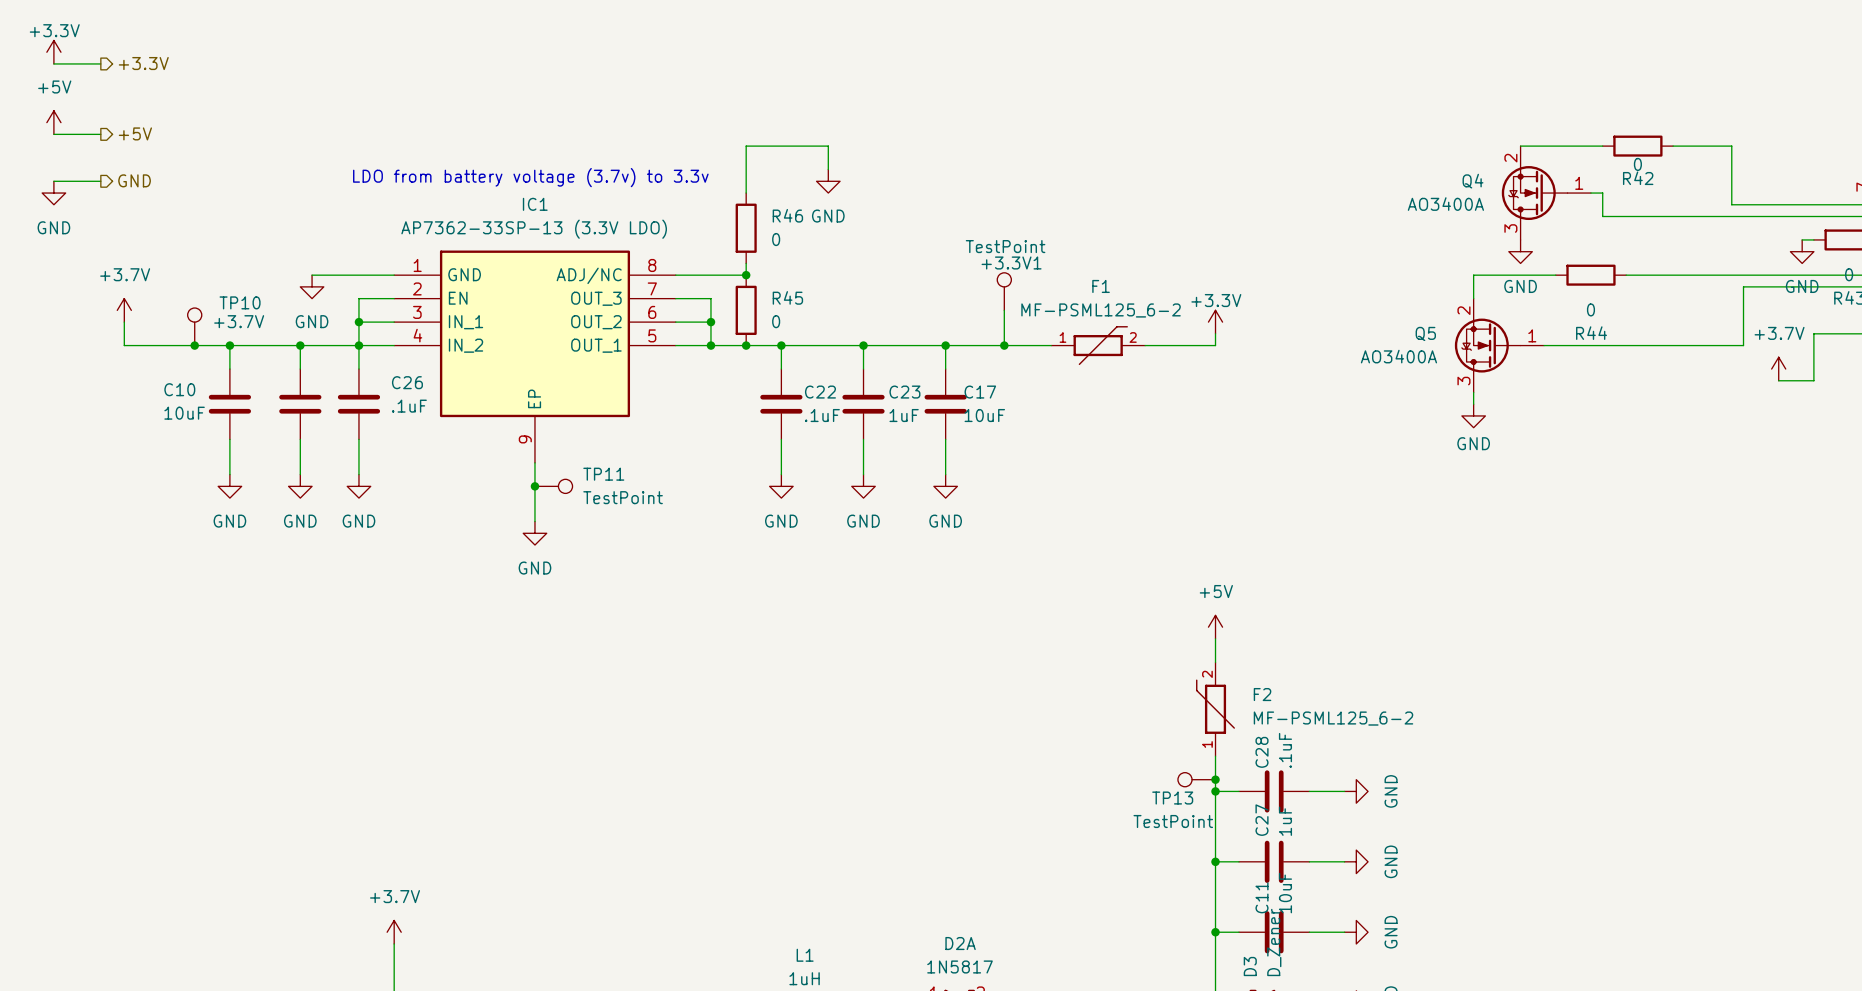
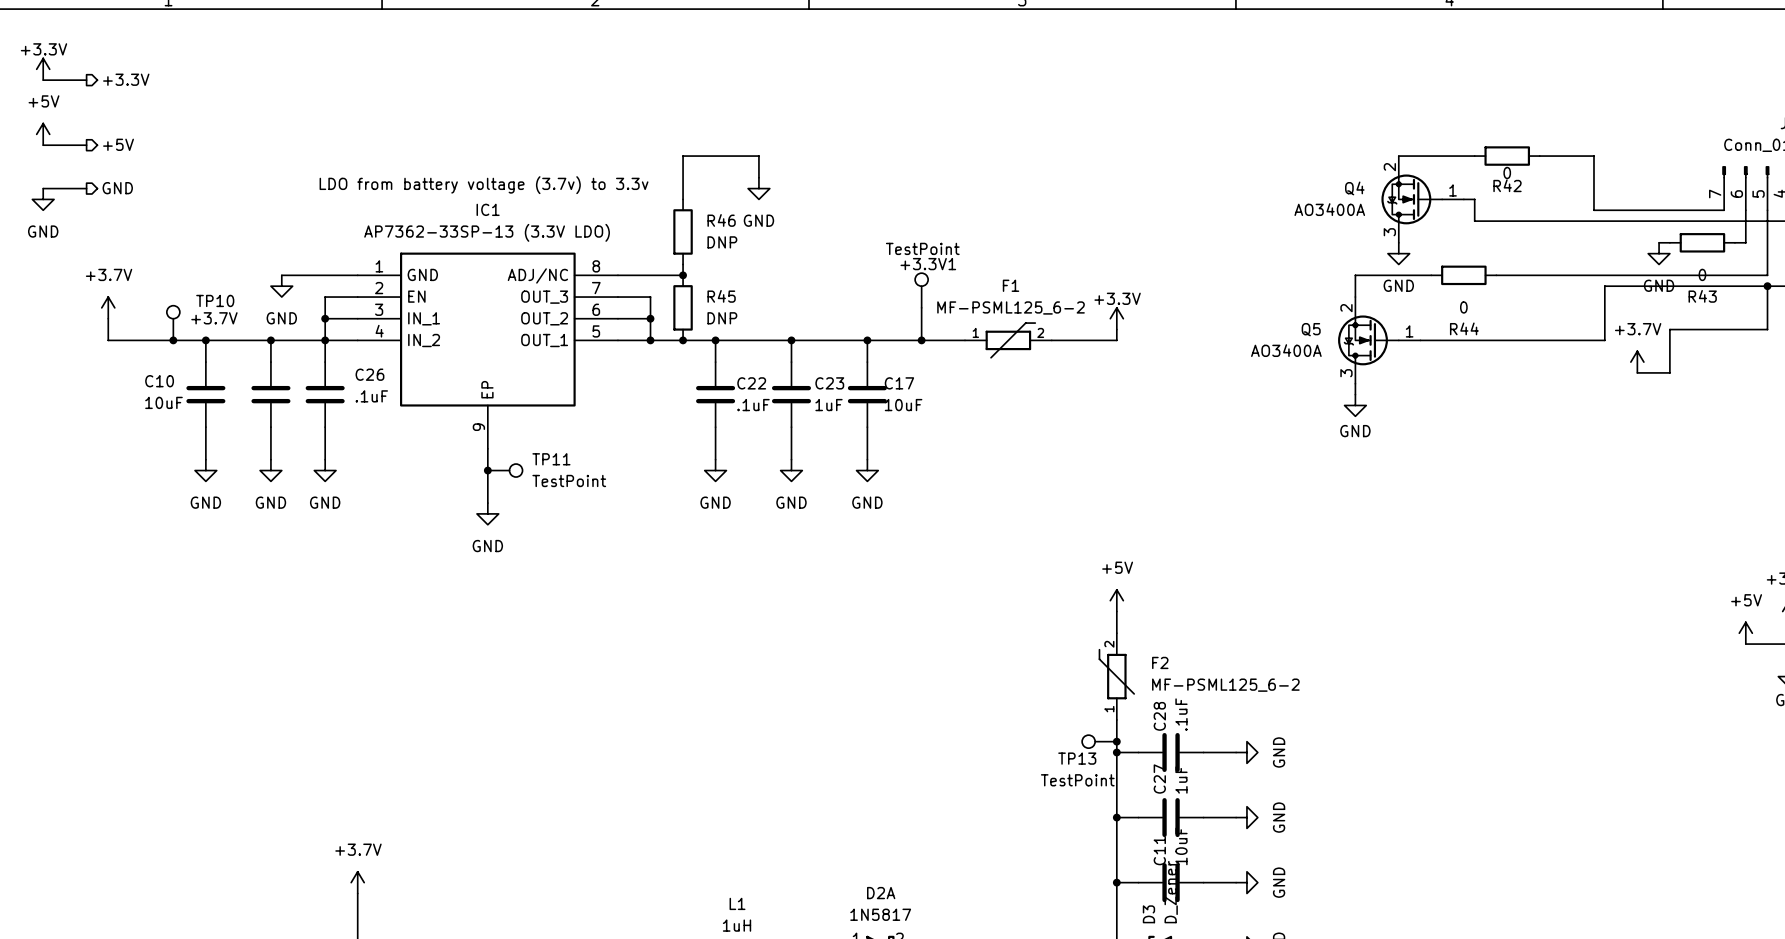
R46 value: 0 (776, 239) -> DNP (722, 242)
R45 value: 0 (776, 321) -> DNP (722, 318)

